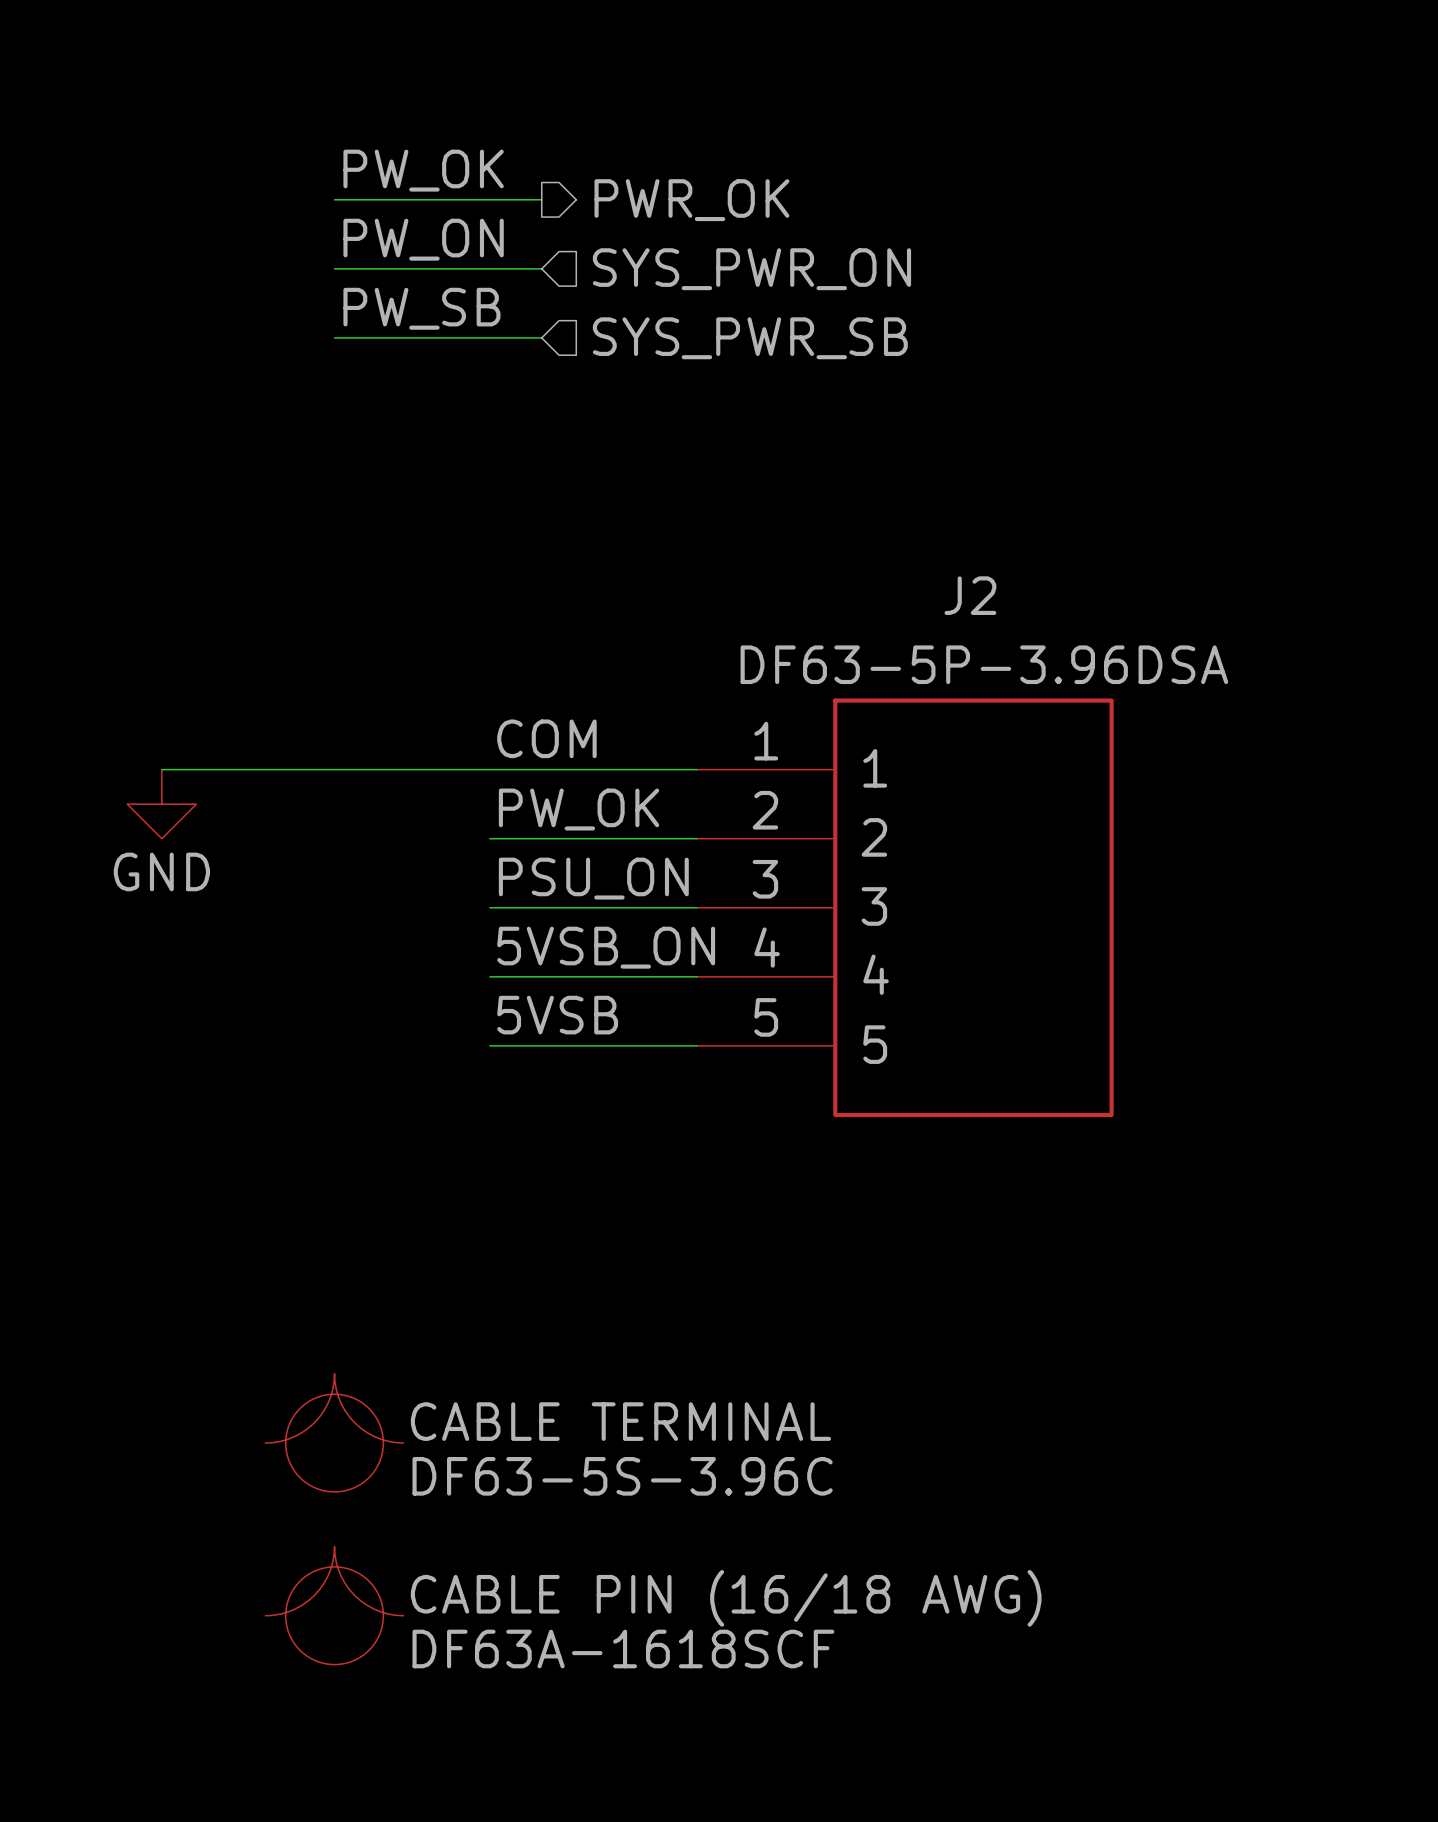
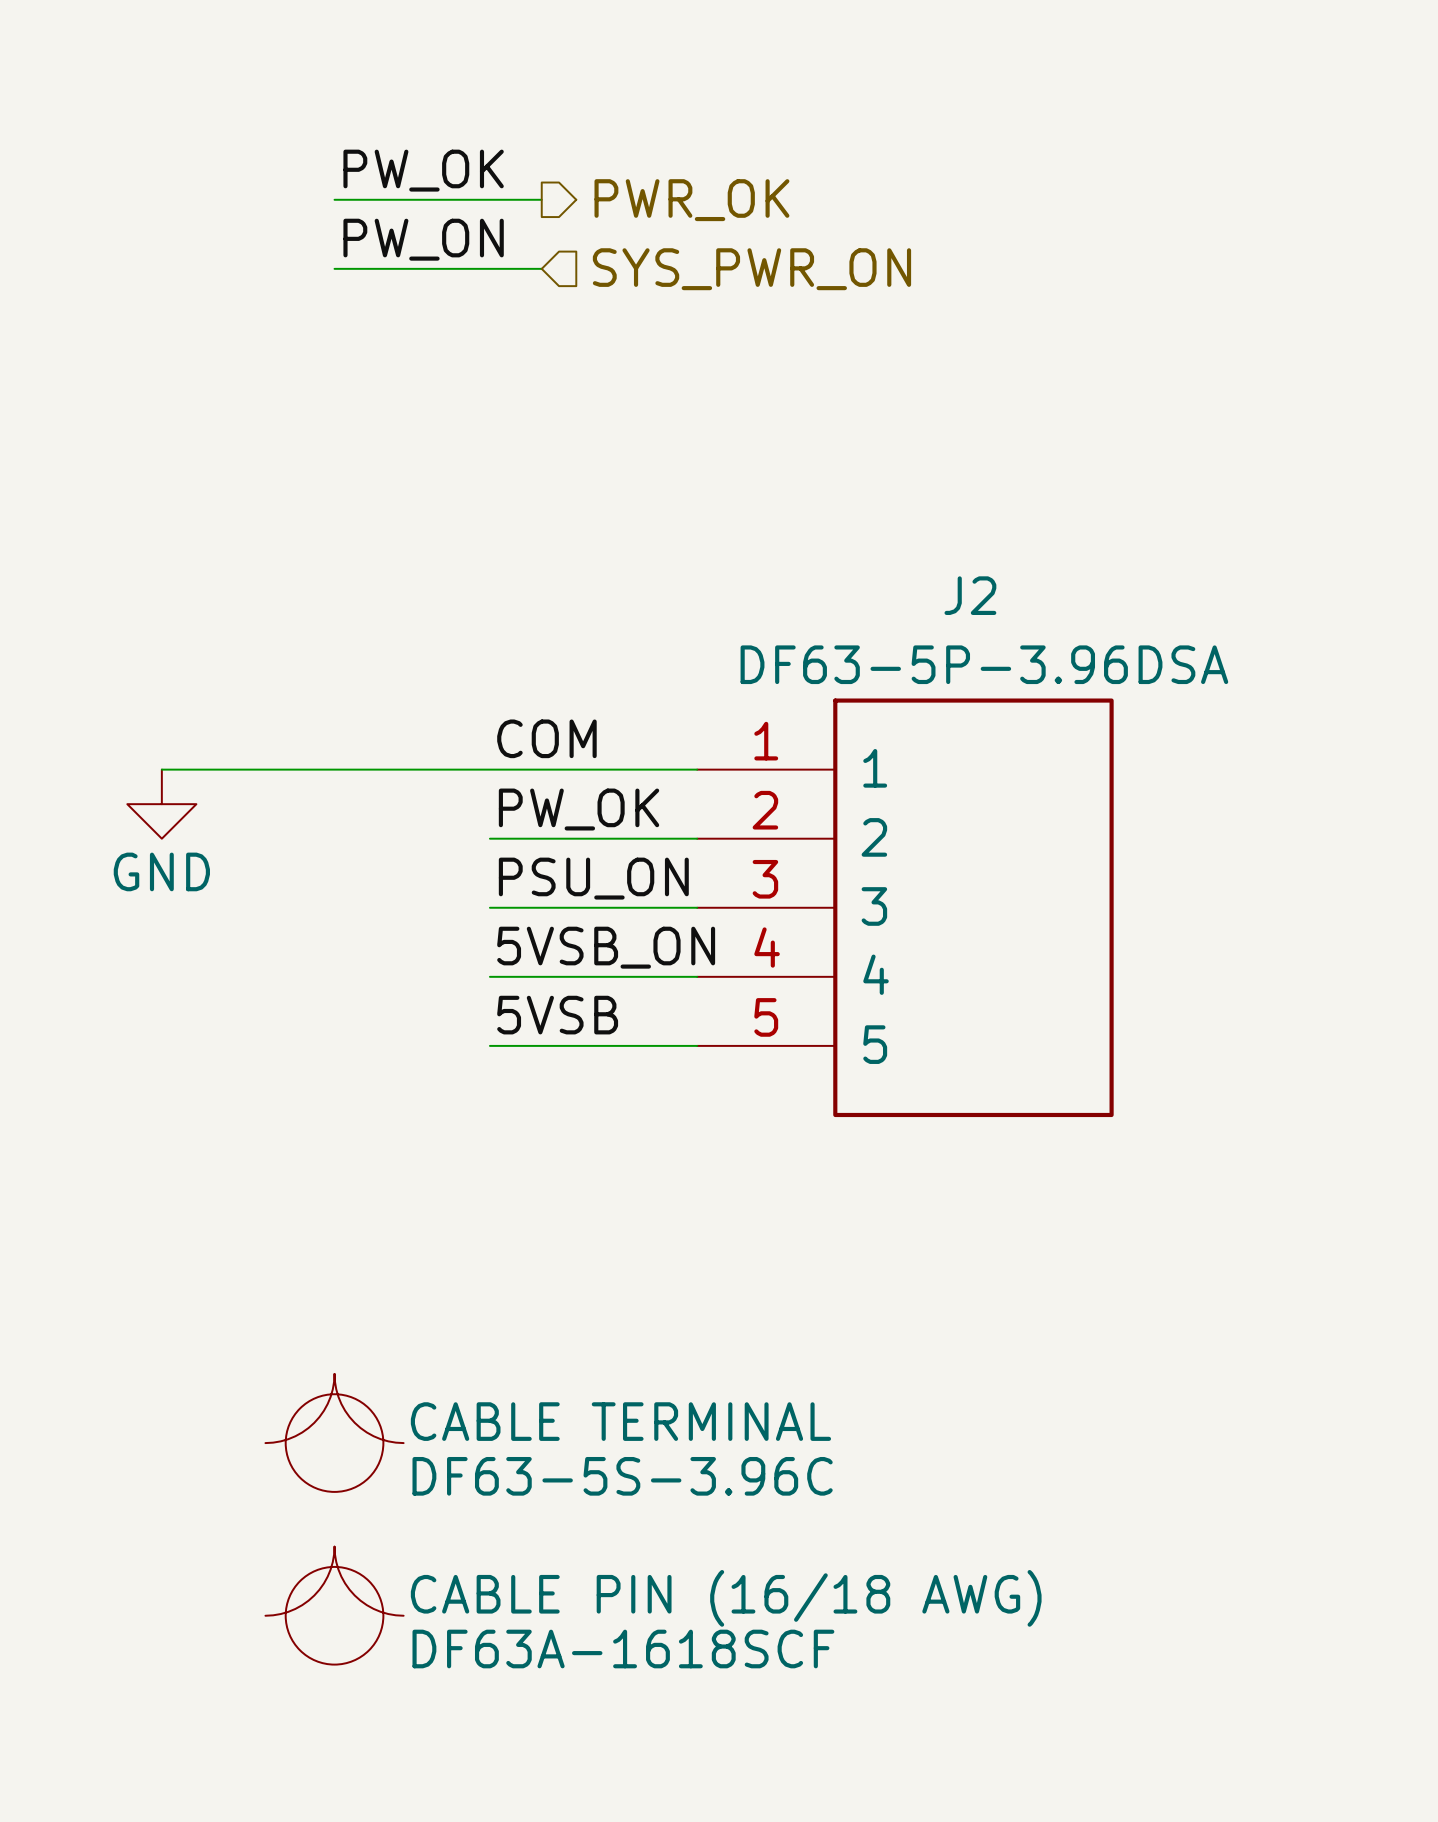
label: PW_SB (421, 308) -> none
wire: (334, 337) (541, 337) -> none
hierarchical label: SYS_PWR_SB (750, 338) -> none

